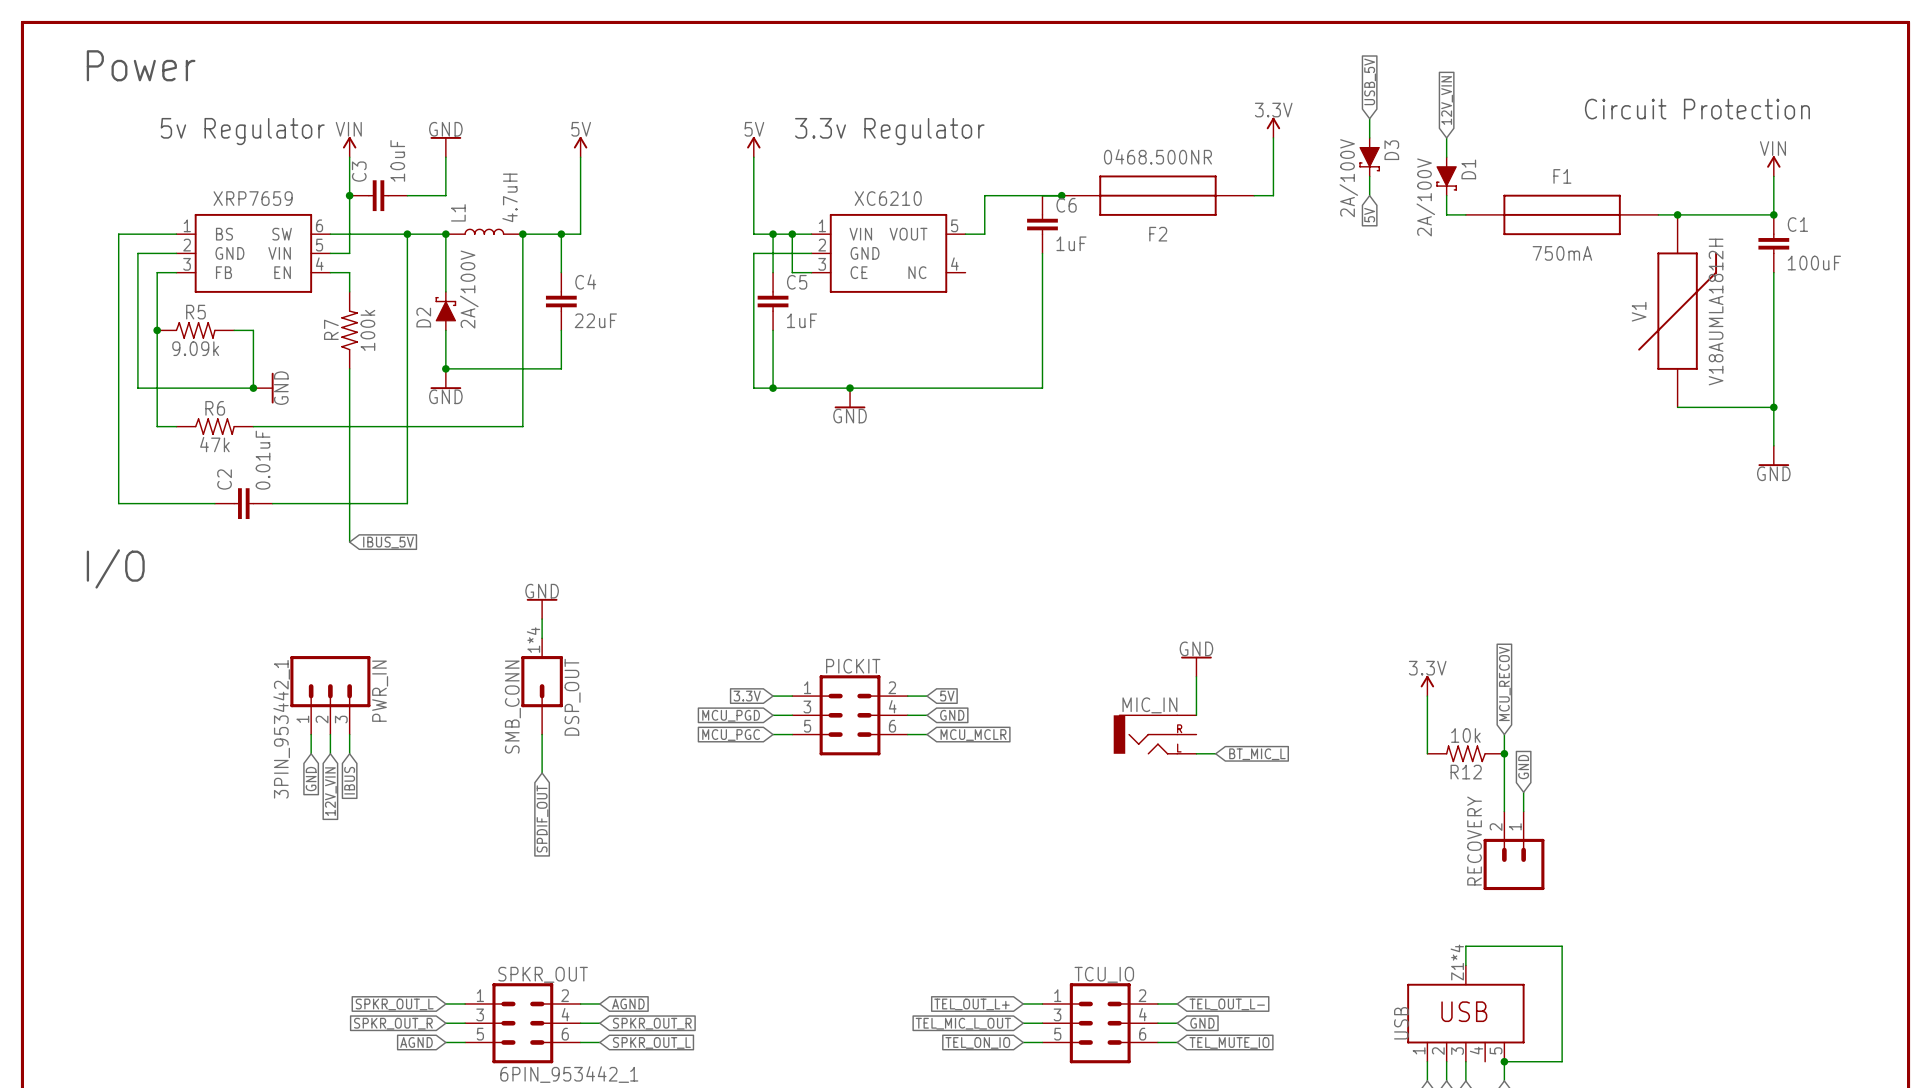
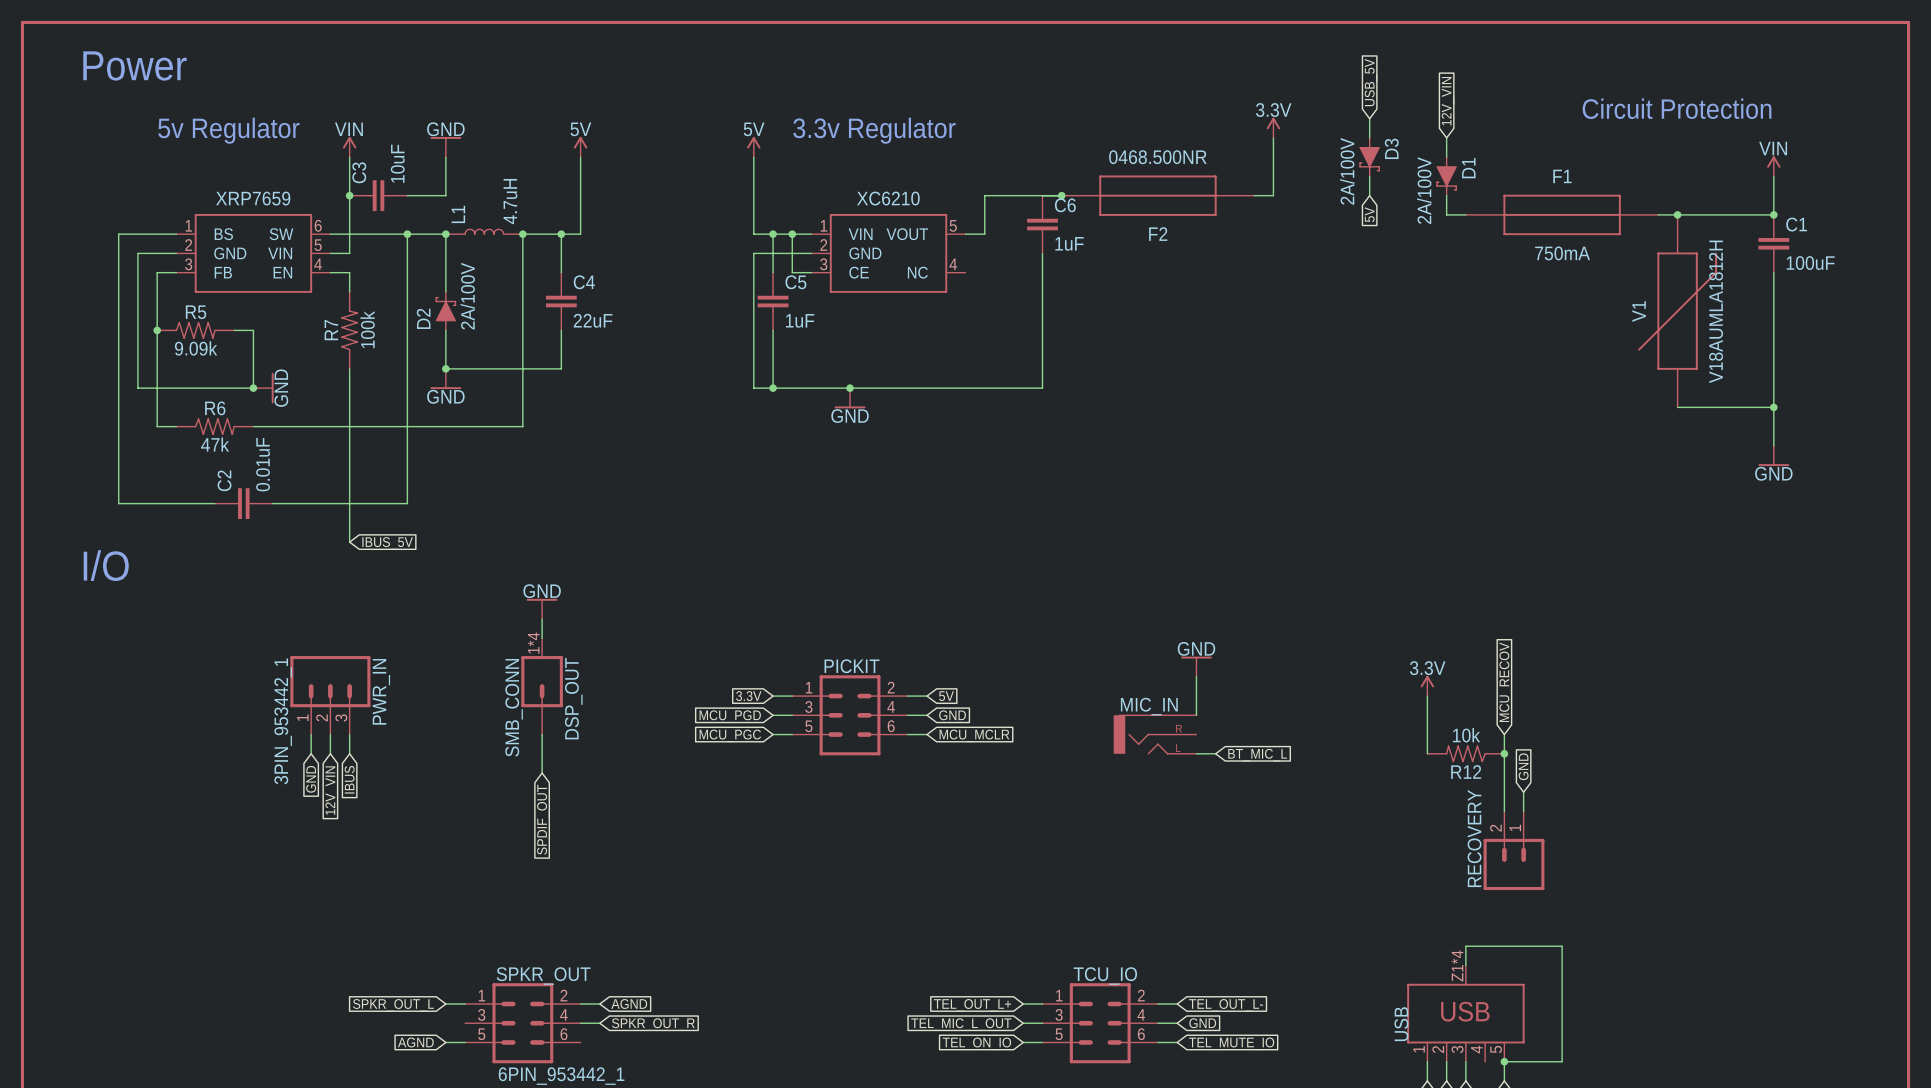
global label: SPKR_OUT_R (393, 1023) -> none
wire: (445, 1023) (465, 1023) -> none
wire: (580, 1042) (599, 1042) -> none
global label: SPKR_OUT_L (651, 1042) -> none

